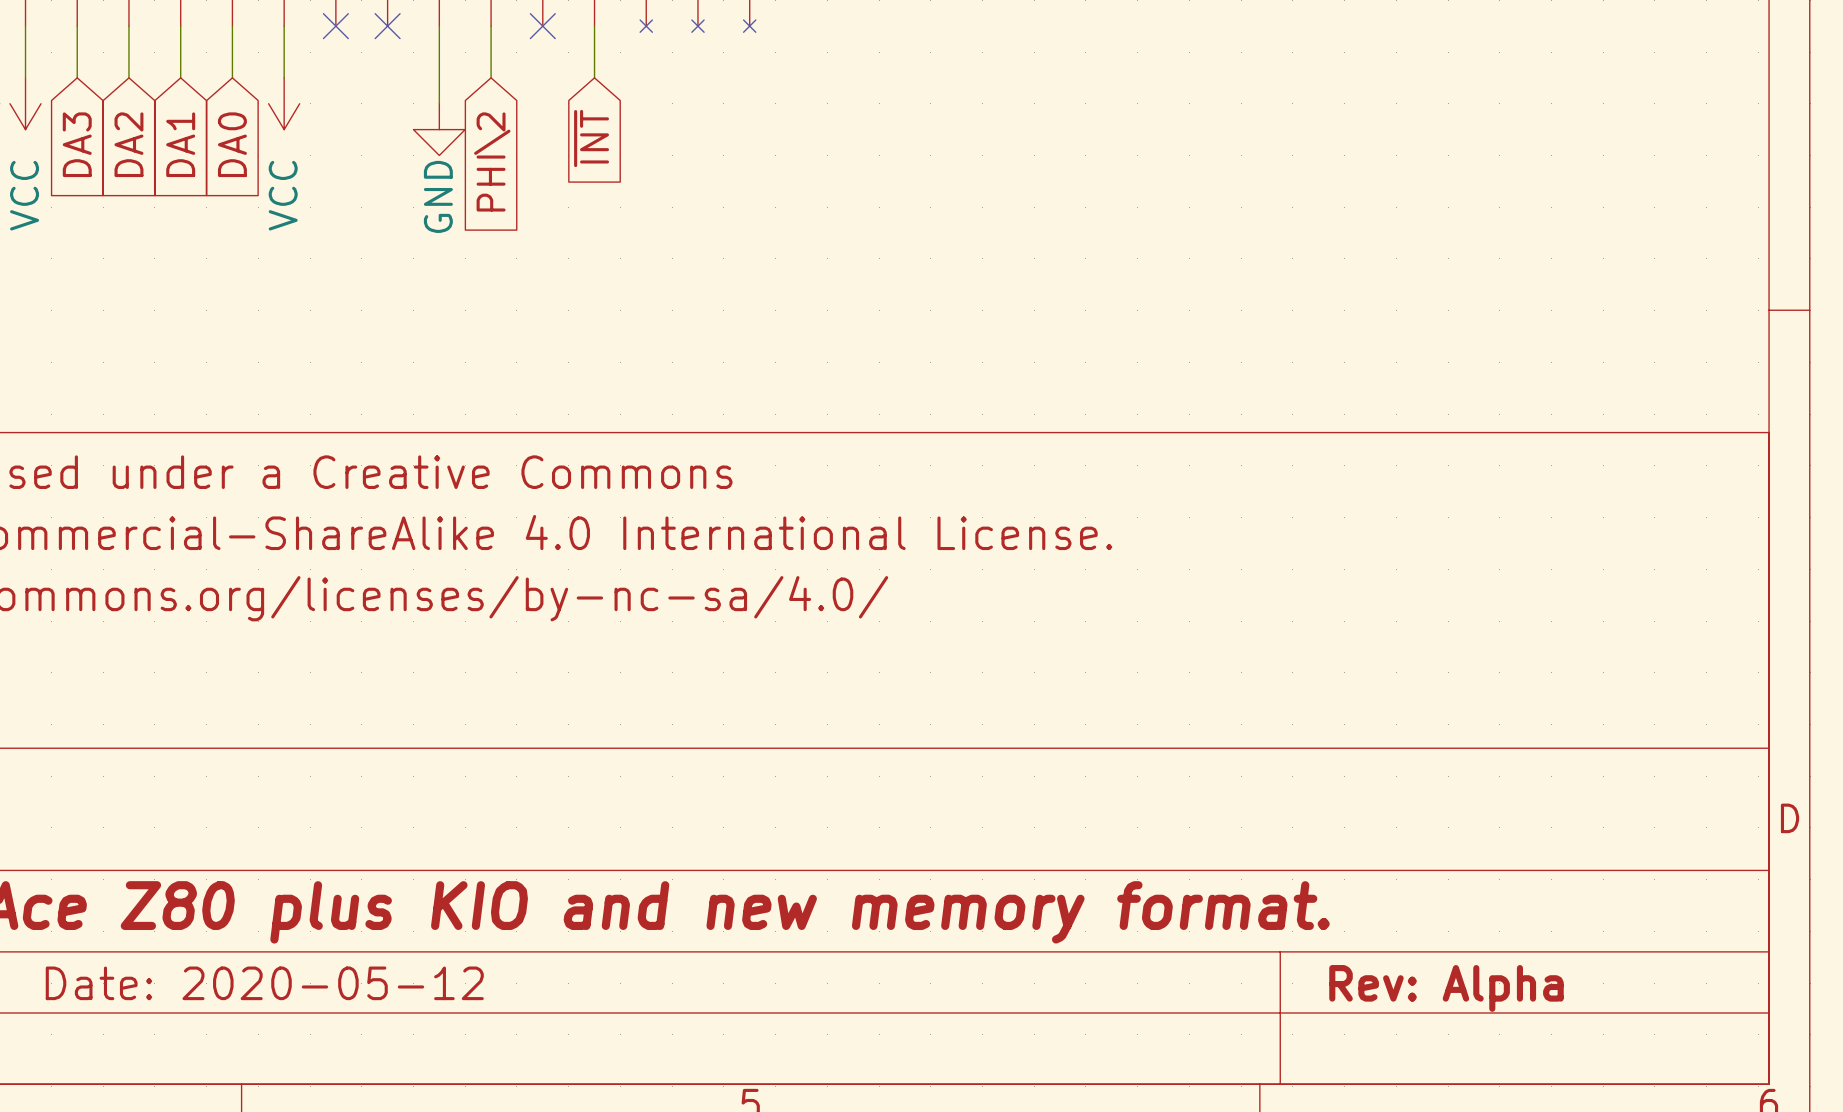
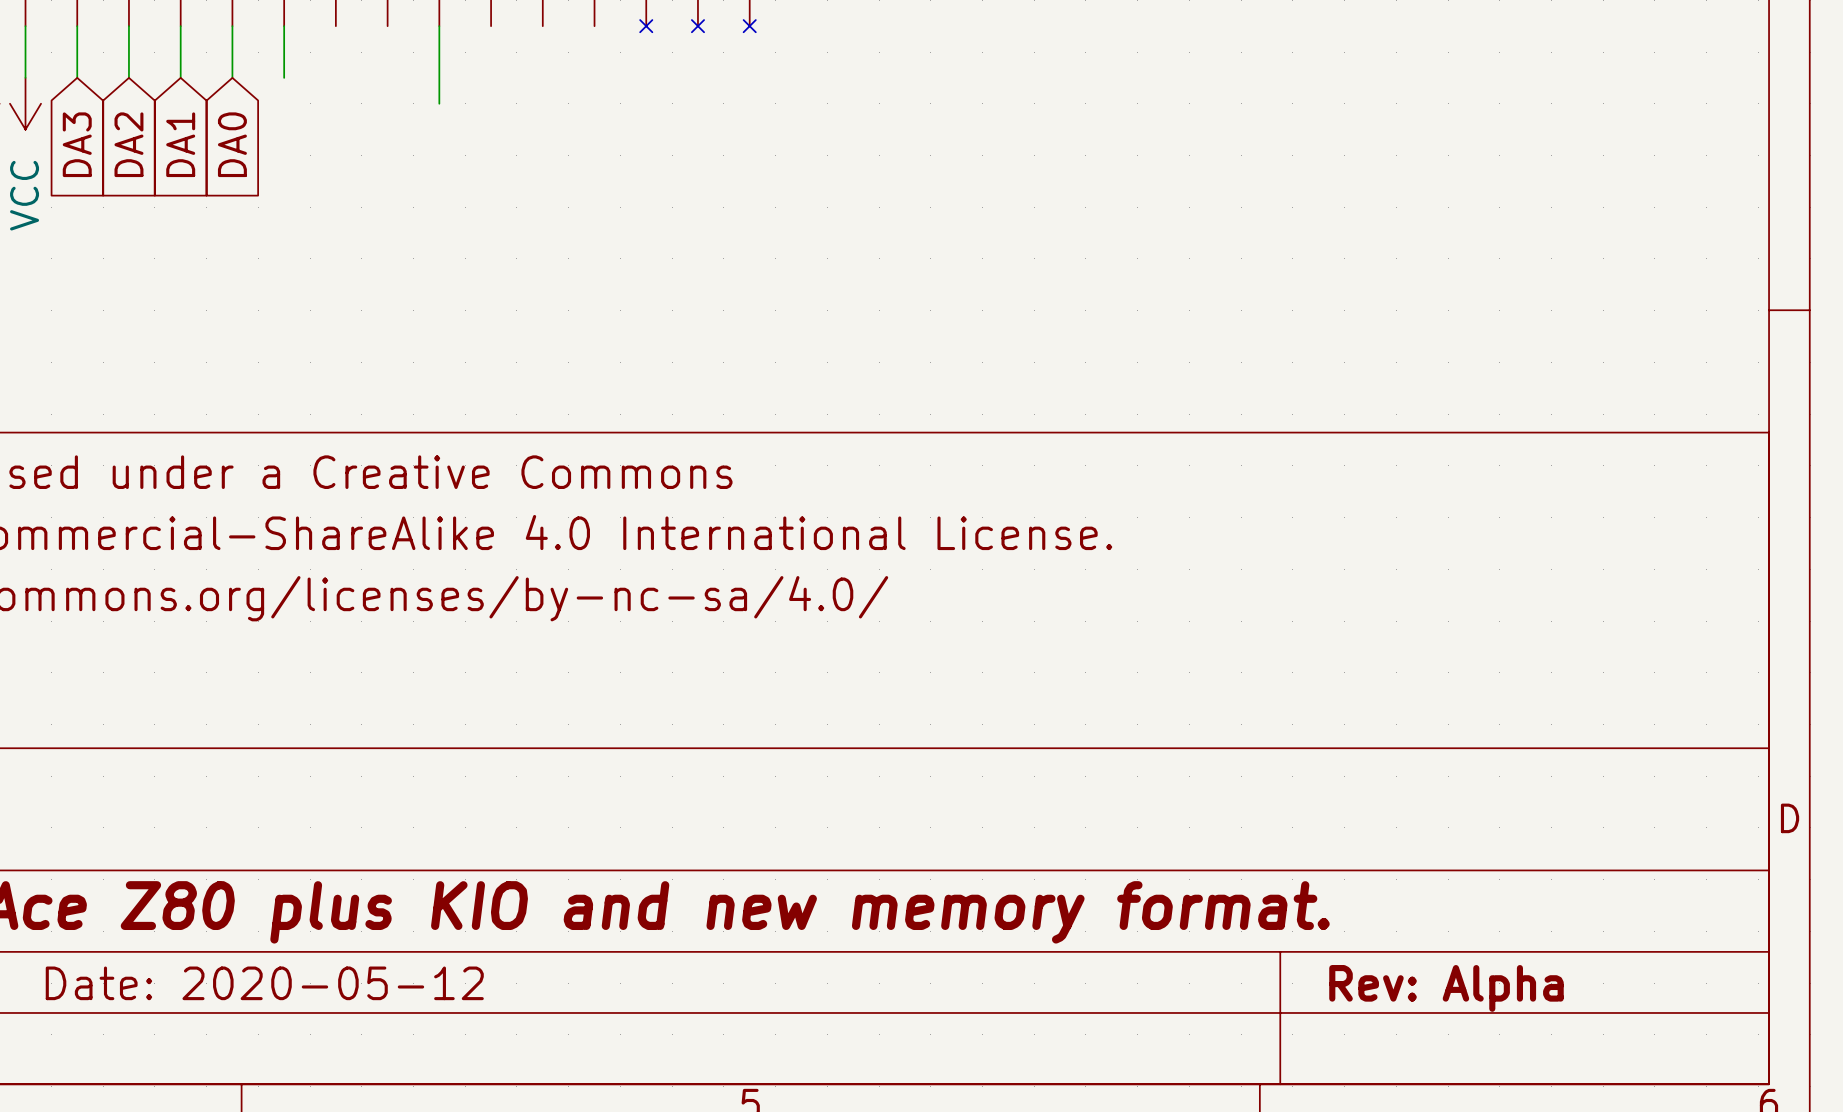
no-connect mark: (335, 26) -> none
no-connect mark: (387, 26) -> none
wire: (491, 26) (491, 77) -> none
no-connect mark: (542, 26) -> none
wire: (594, 26) (594, 77) -> none
power symbol: VCC (284, 103) -> none
power symbol: GND (439, 129) -> none
global label: ~{INT} (591, 138) -> none
global label: PHI\2 (492, 161) -> none

